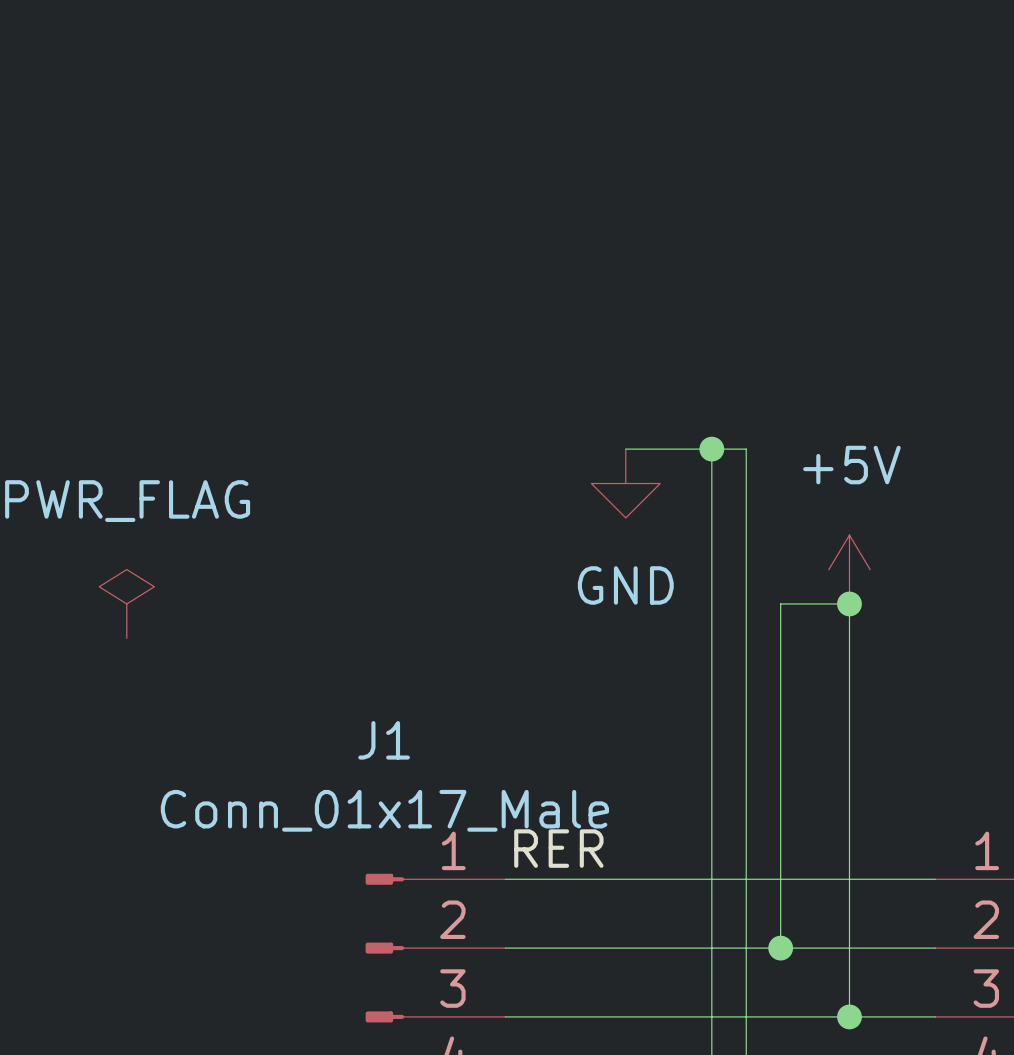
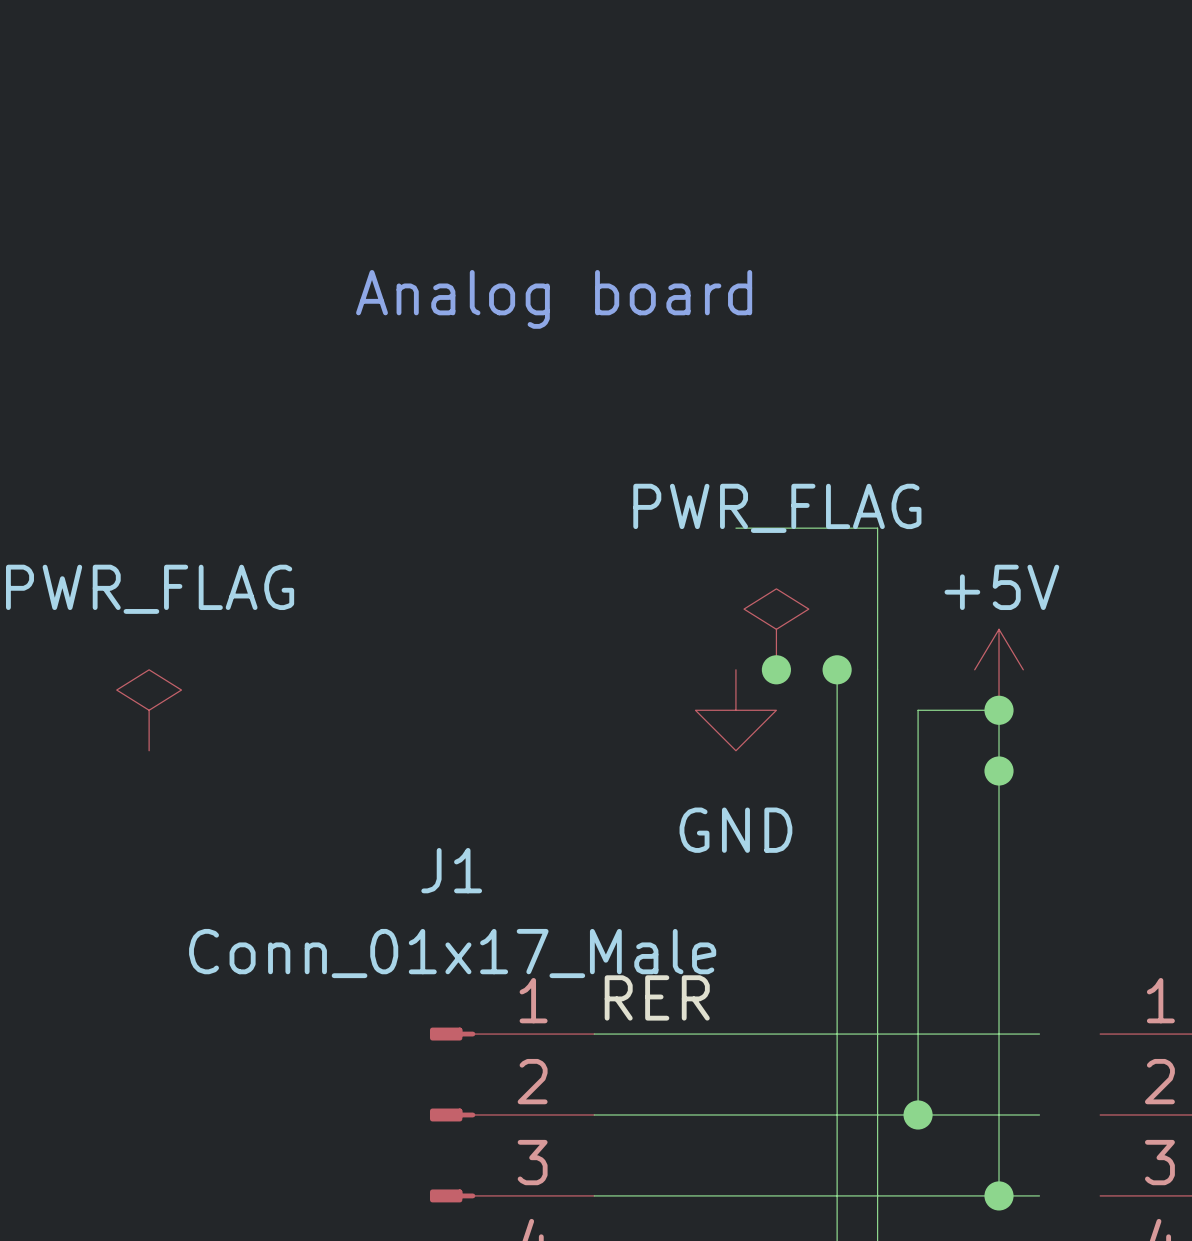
text: none -> Analog board (554, 299)
wire: (711, 449) (711, 569) -> none
junction: (711, 449) -> none
power symbol text position: +5V (851, 465) -> +5V (1001, 587)
power symbol position: GND (625, 483) -> GND (735, 710)
power symbol: none -> PWR_FLAG (776, 629)
junction: none -> (776, 669)
junction: none -> (837, 669)
junction: none -> (999, 770)
wire: (883, 879) (935, 879) -> none
wire: (883, 948) (935, 948) -> none
wire: (883, 1016) (935, 1016) -> none

